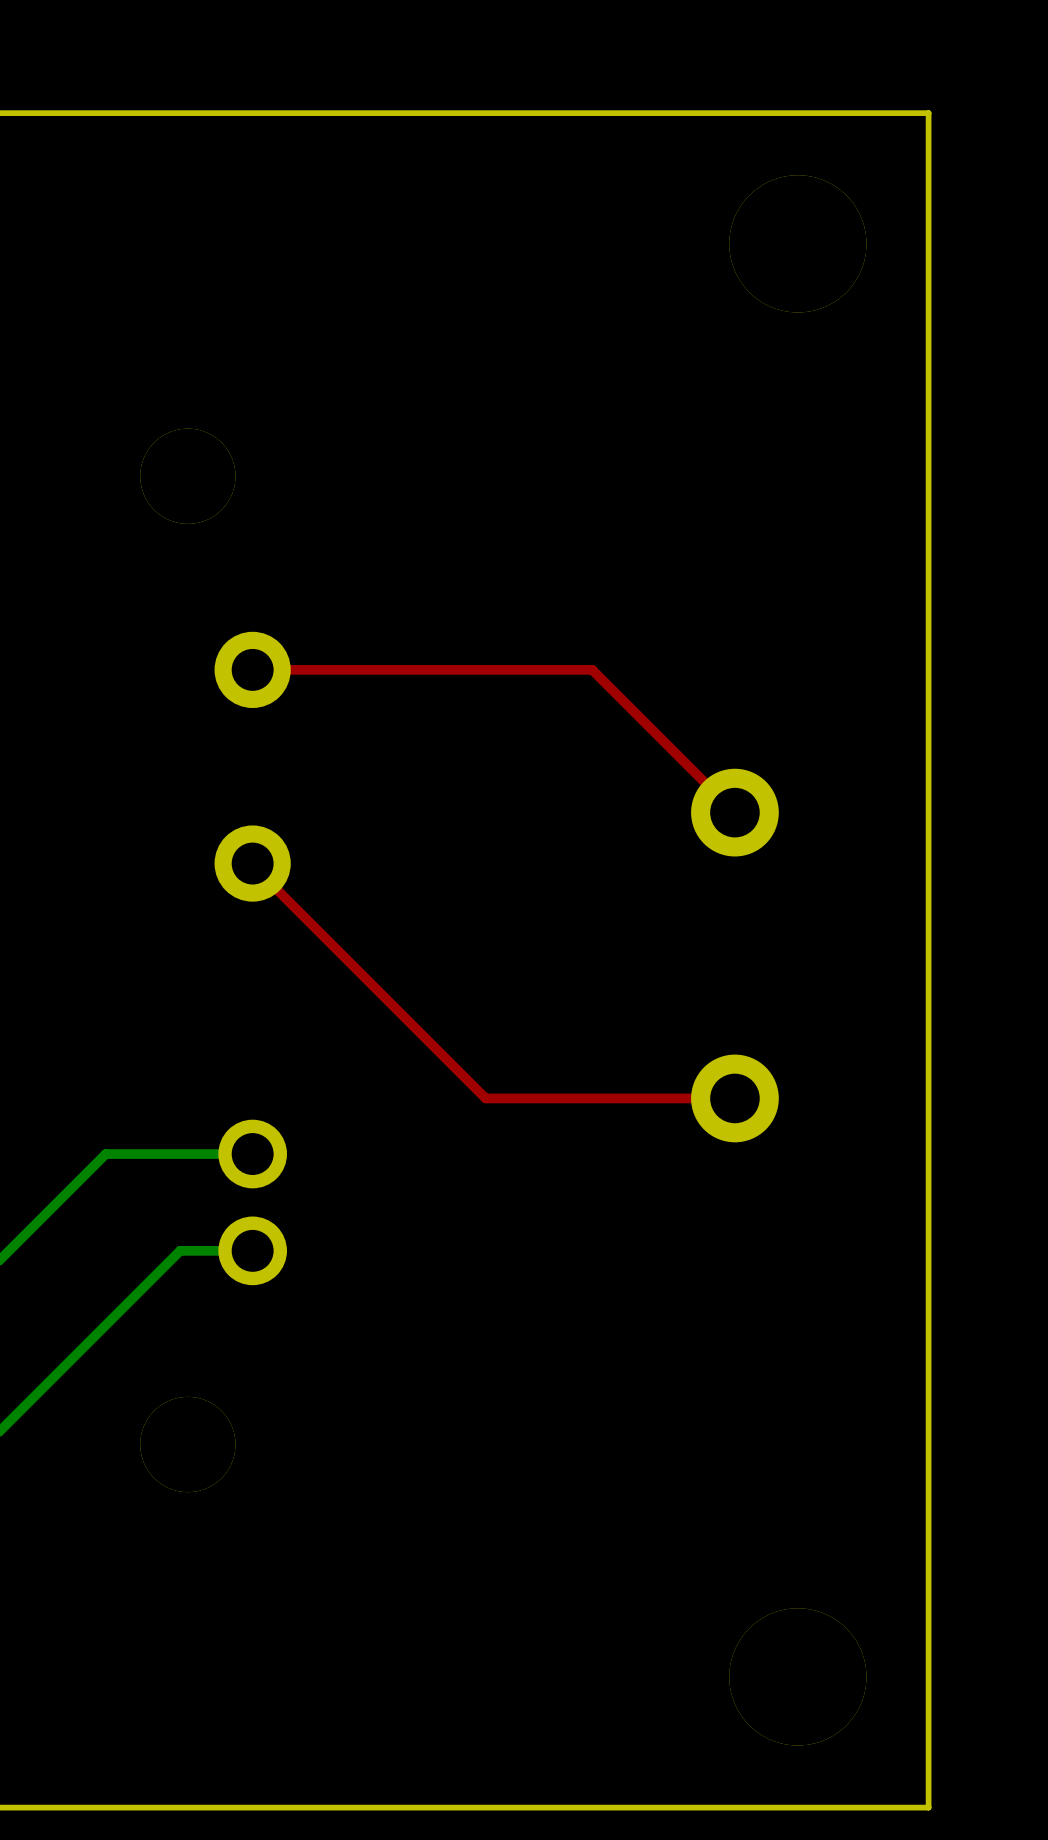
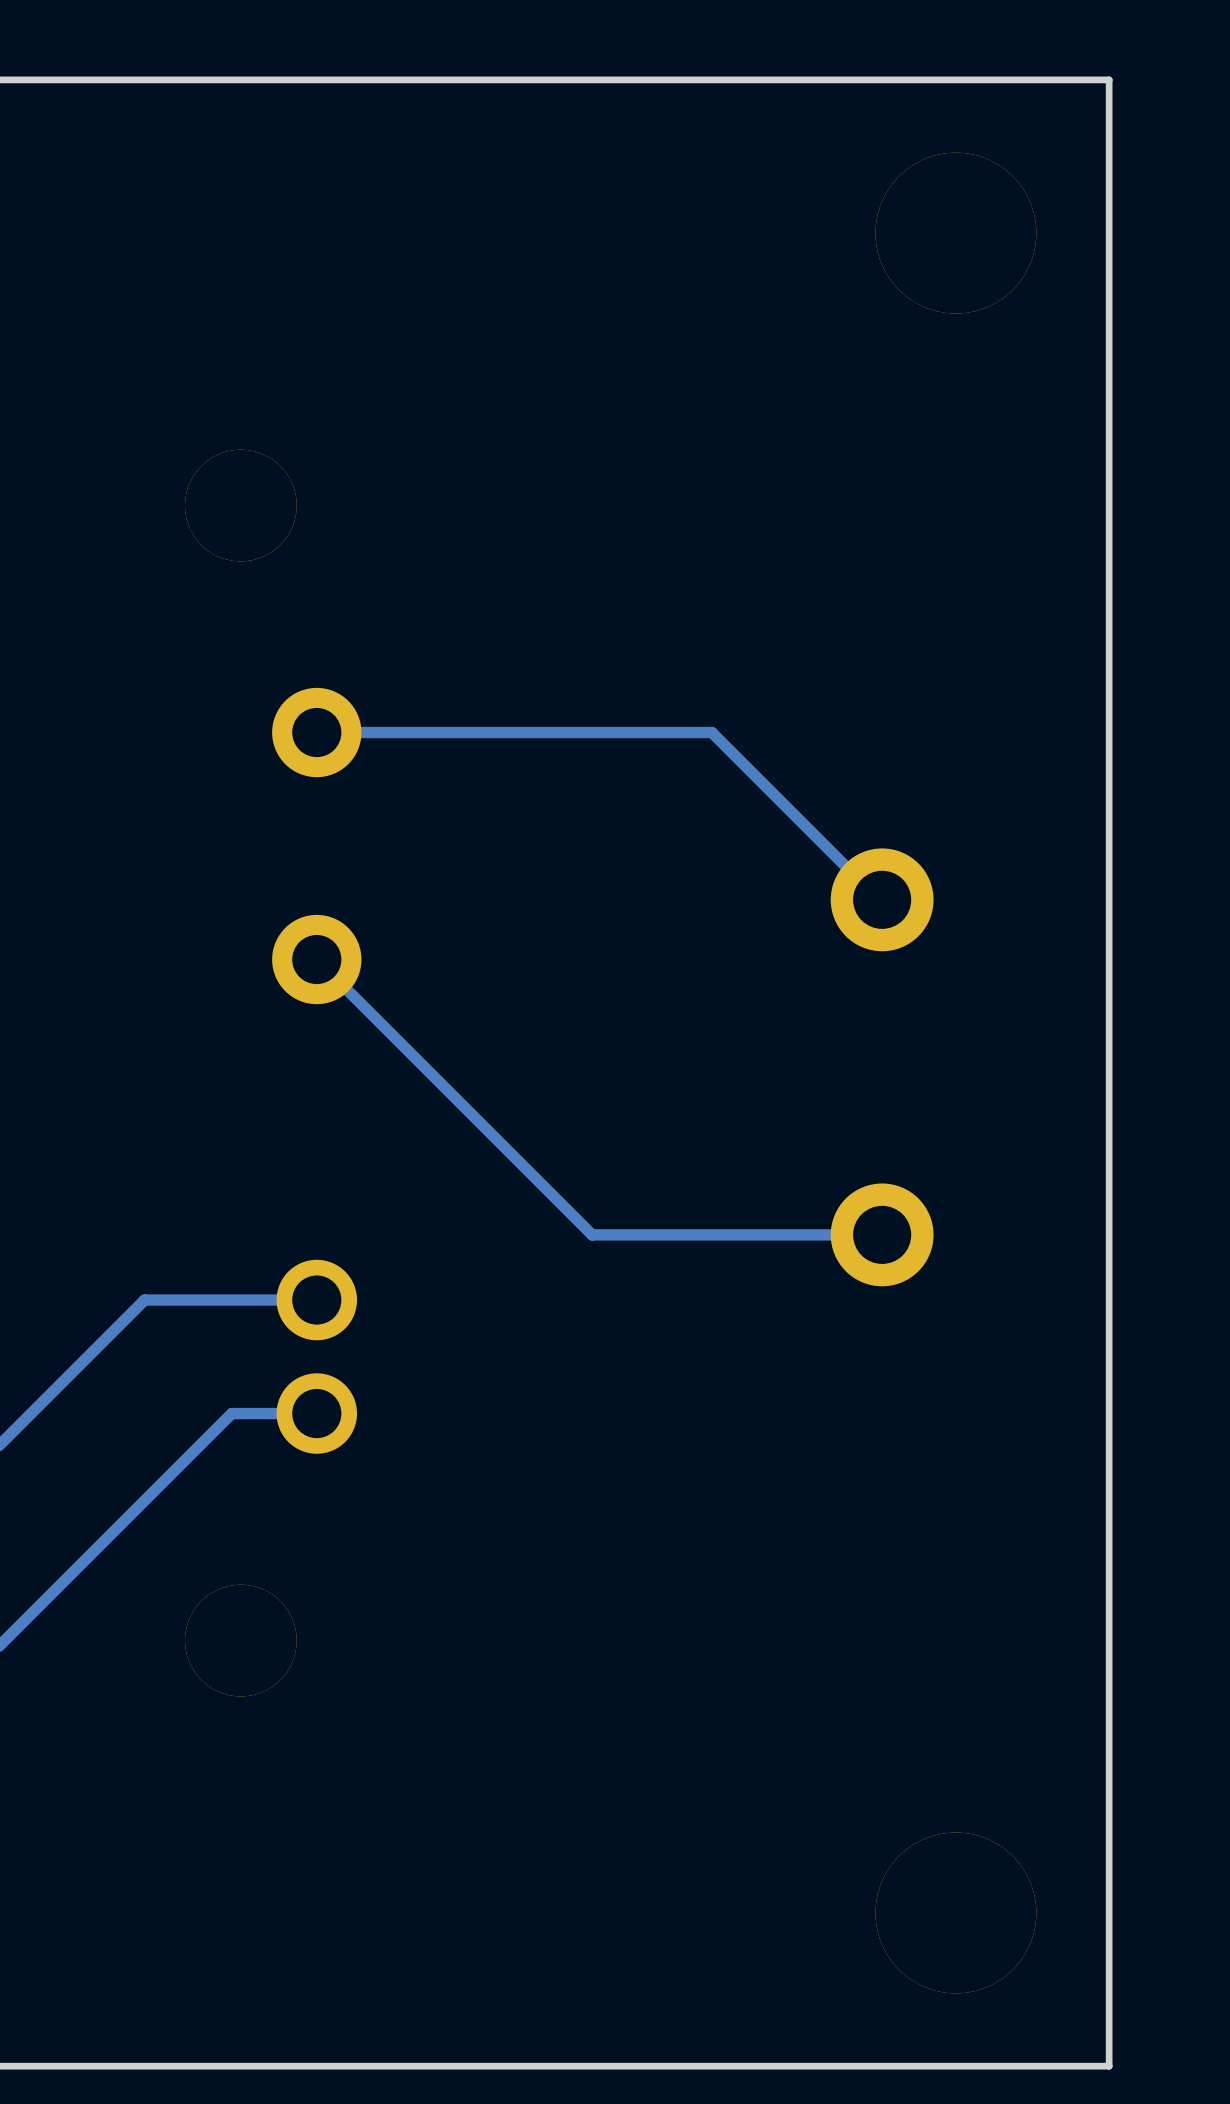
top track: (252, 669) (592, 669) (734, 812) -> none
bottom track: none -> (316, 732) (711, 732) (879, 899) (882, 899)
top track: (252, 863) (485, 1098) (734, 1098) -> none
bottom track: none -> (316, 959) (592, 1234) (882, 1234)

